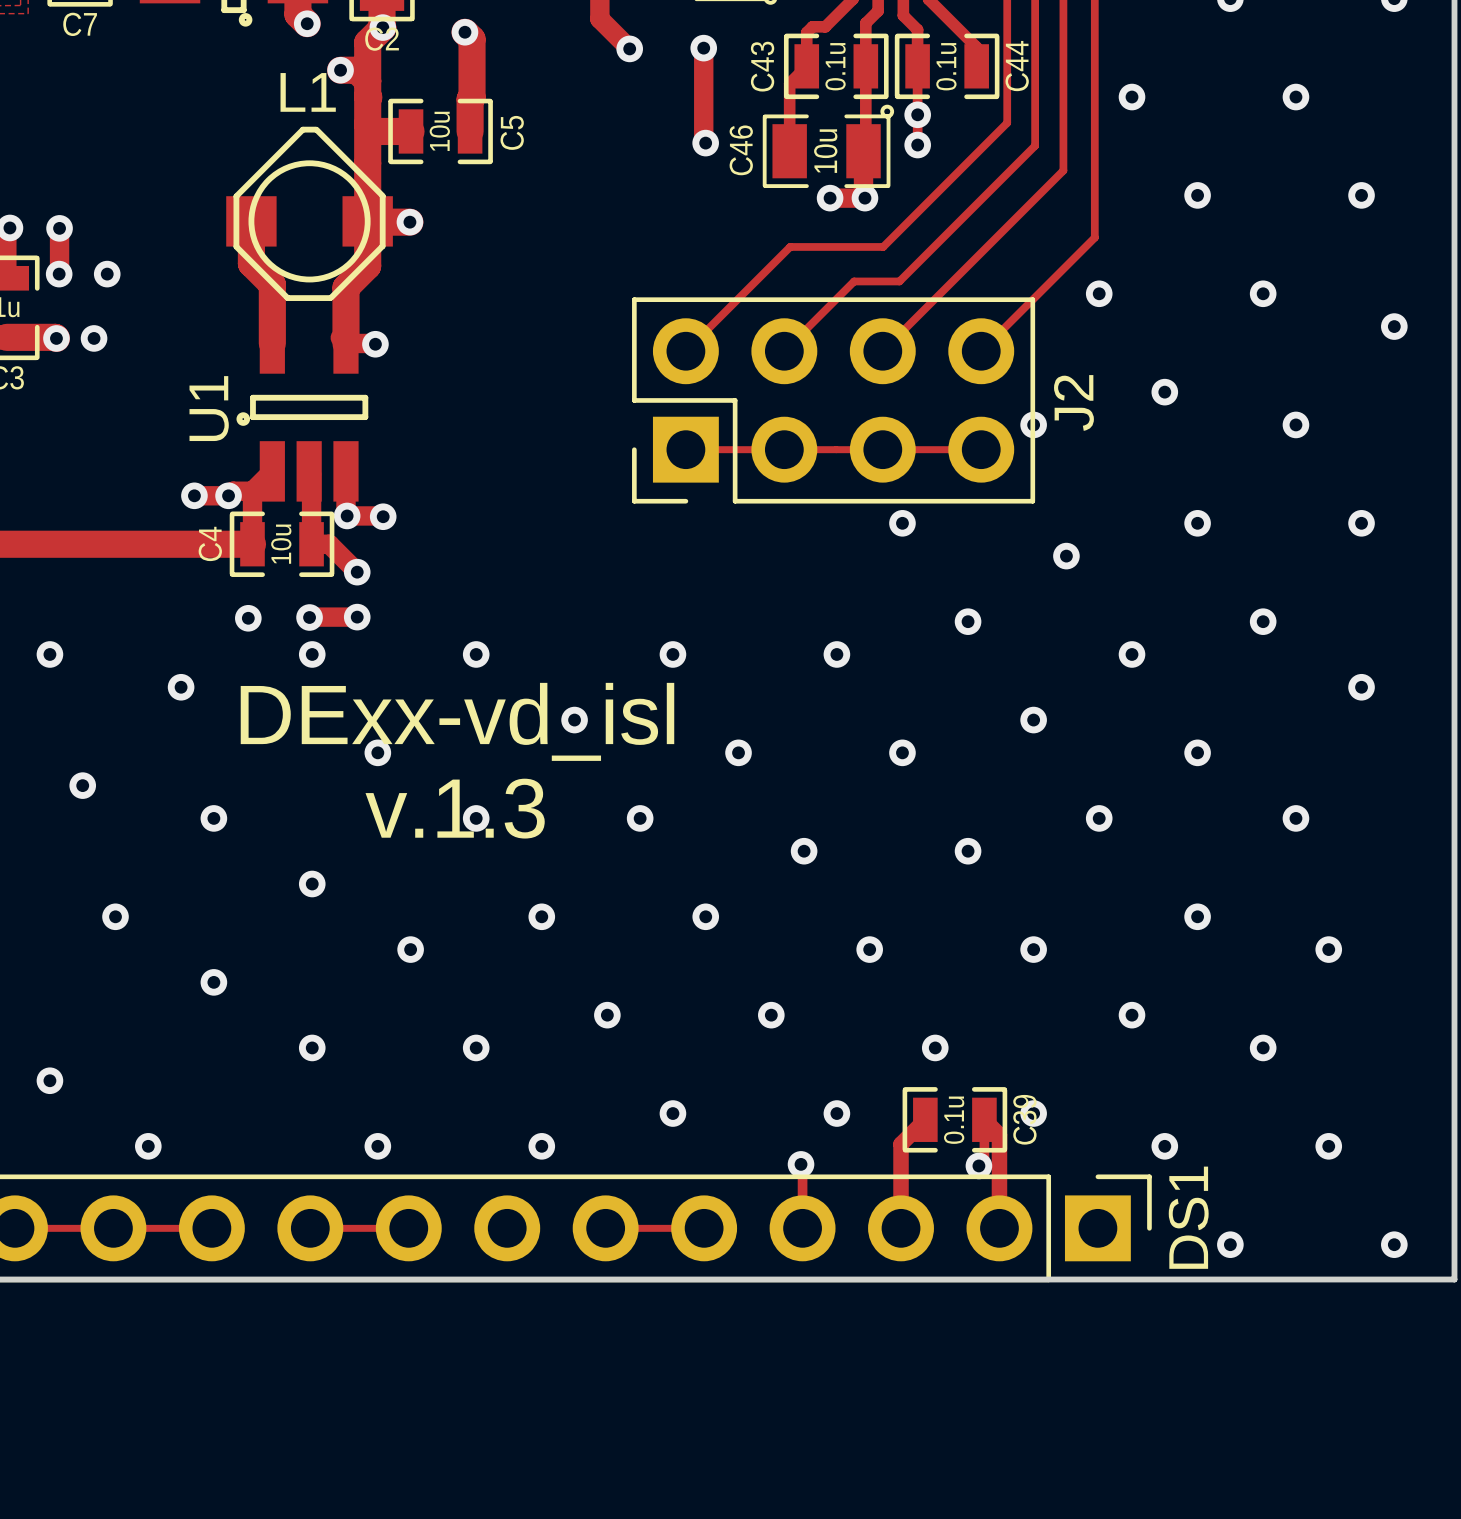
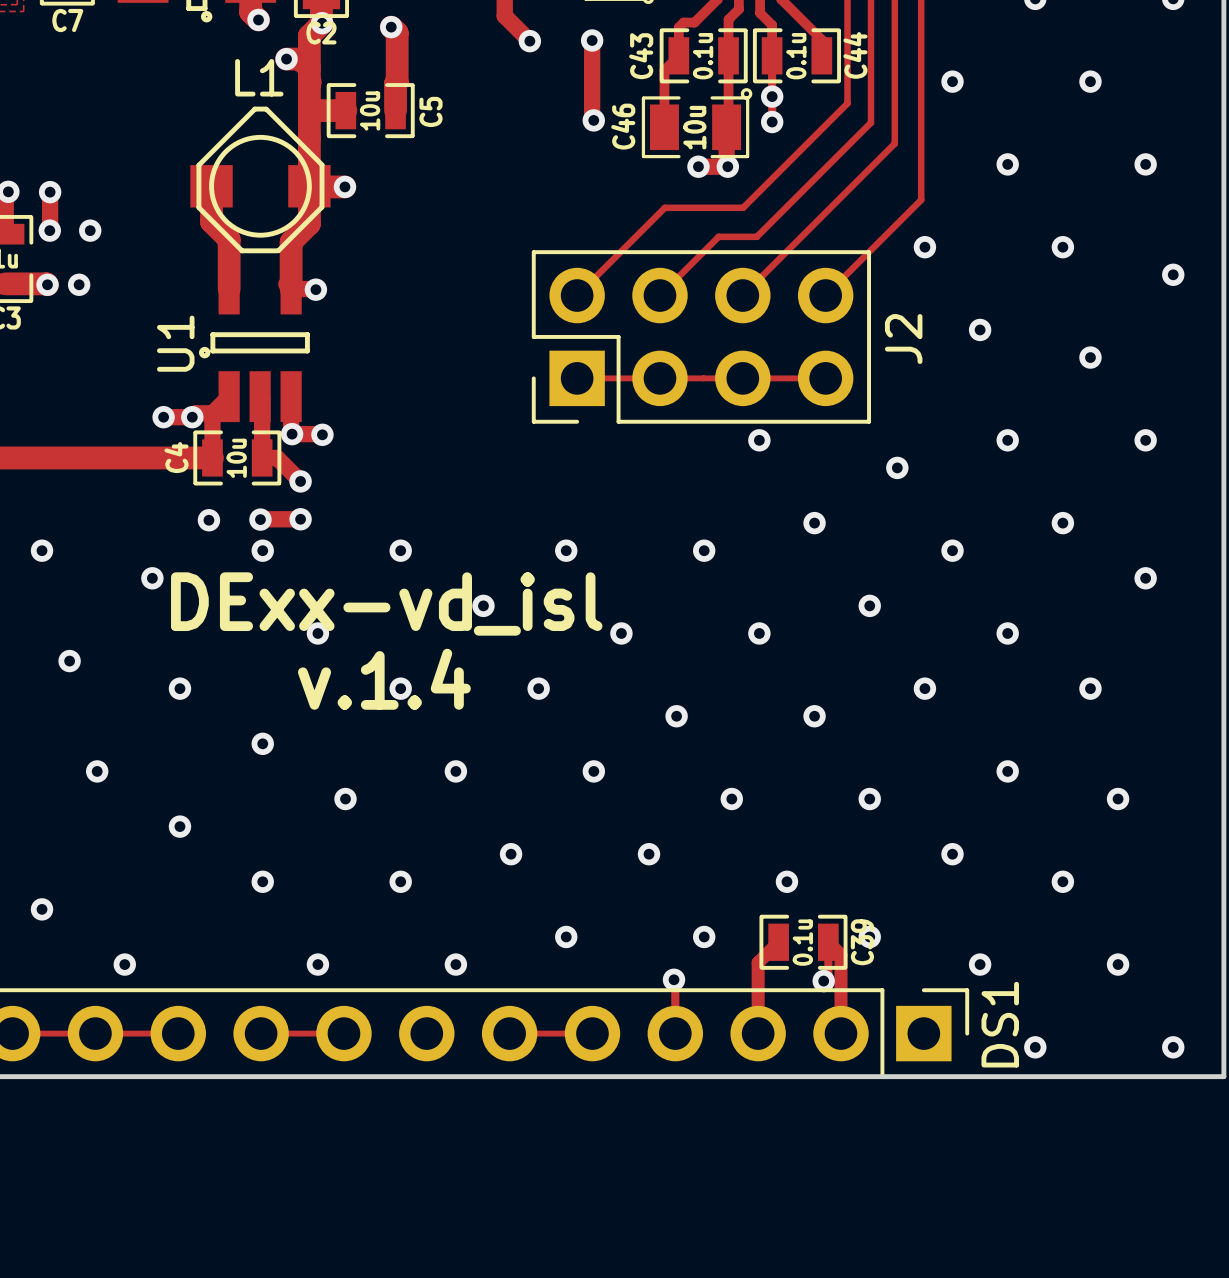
via: (1033, 424) -> none
text: v.1.3 (455, 808) -> v.1.4 (384, 679)

